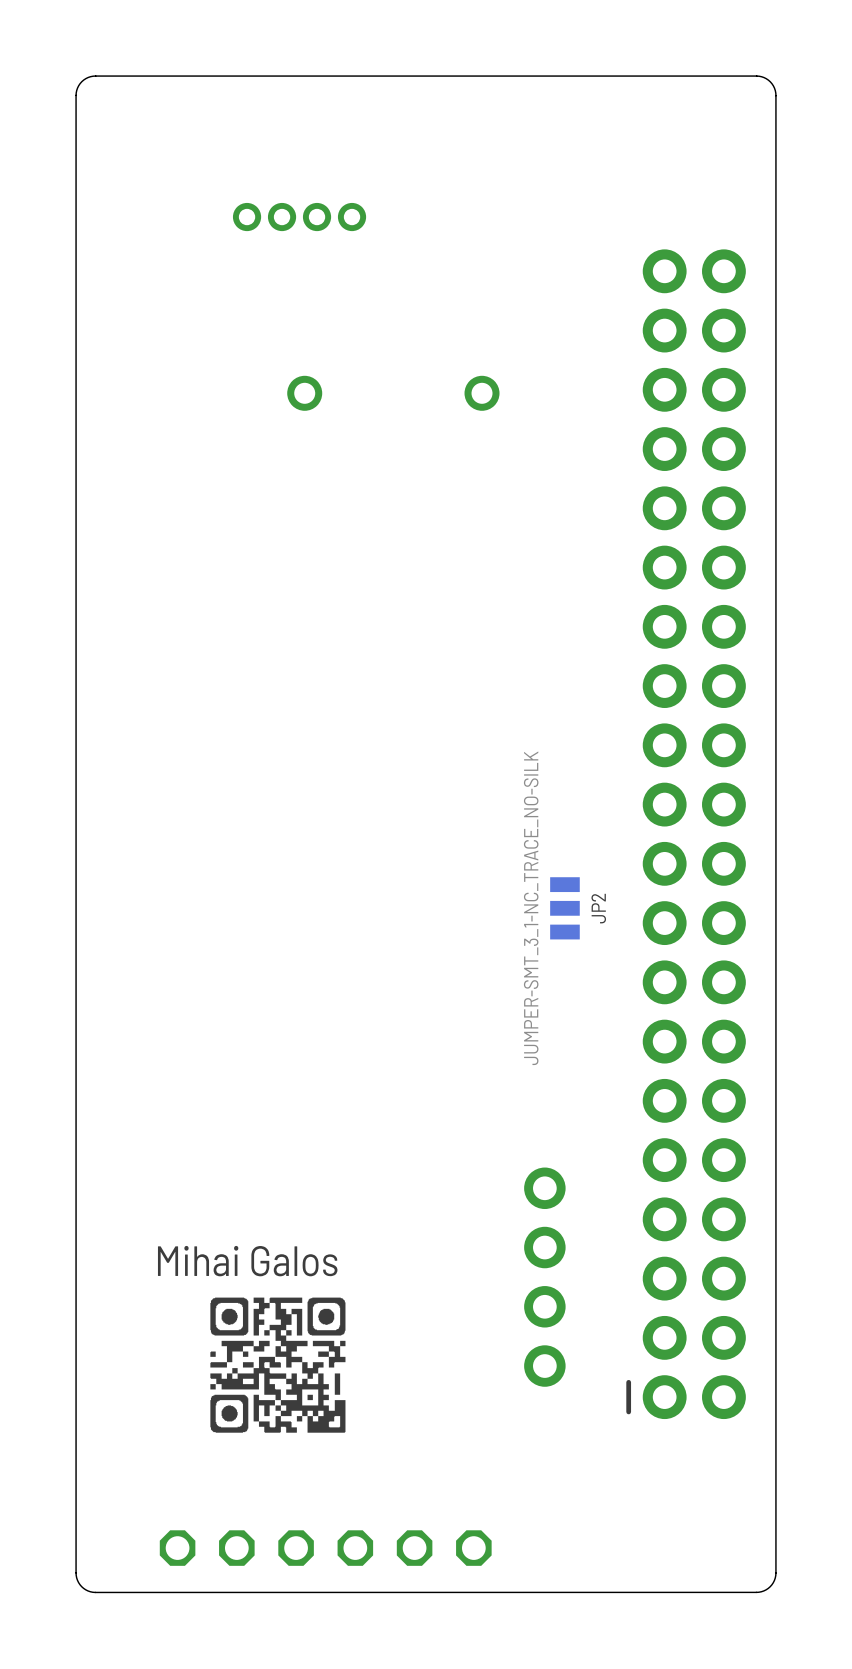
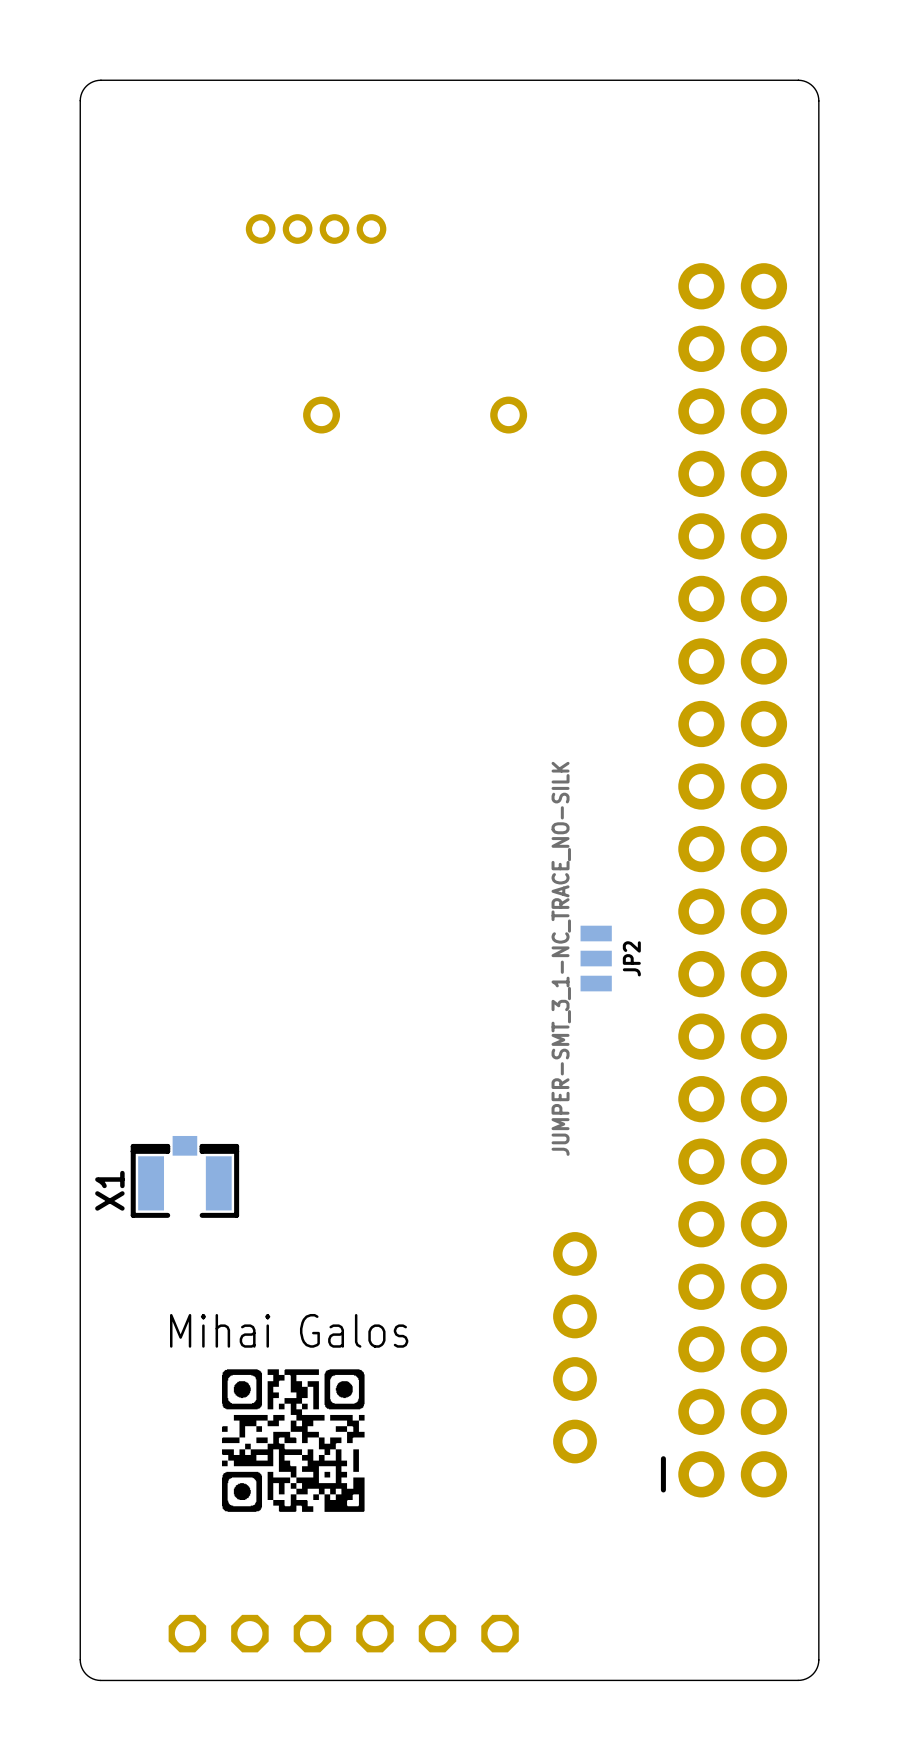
X1: none -> (184, 1176)

